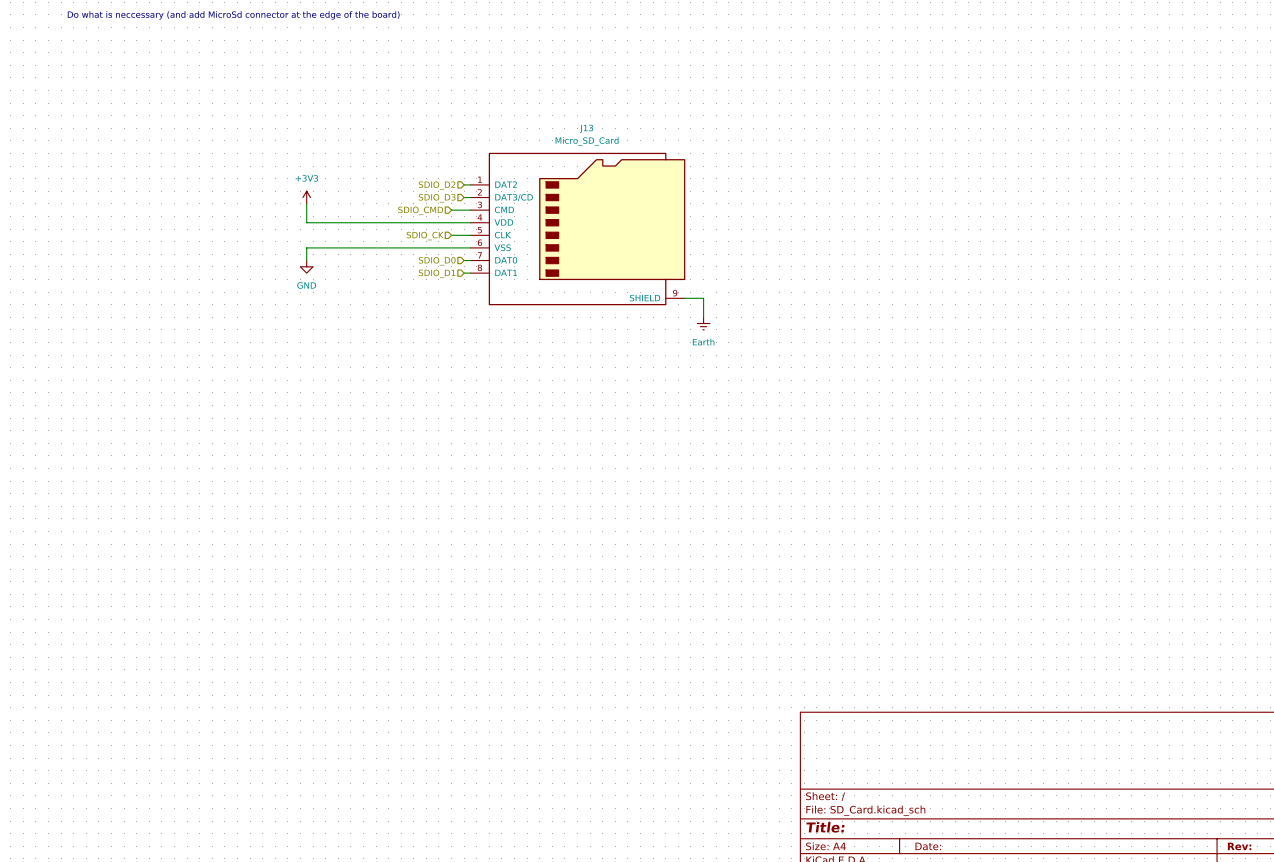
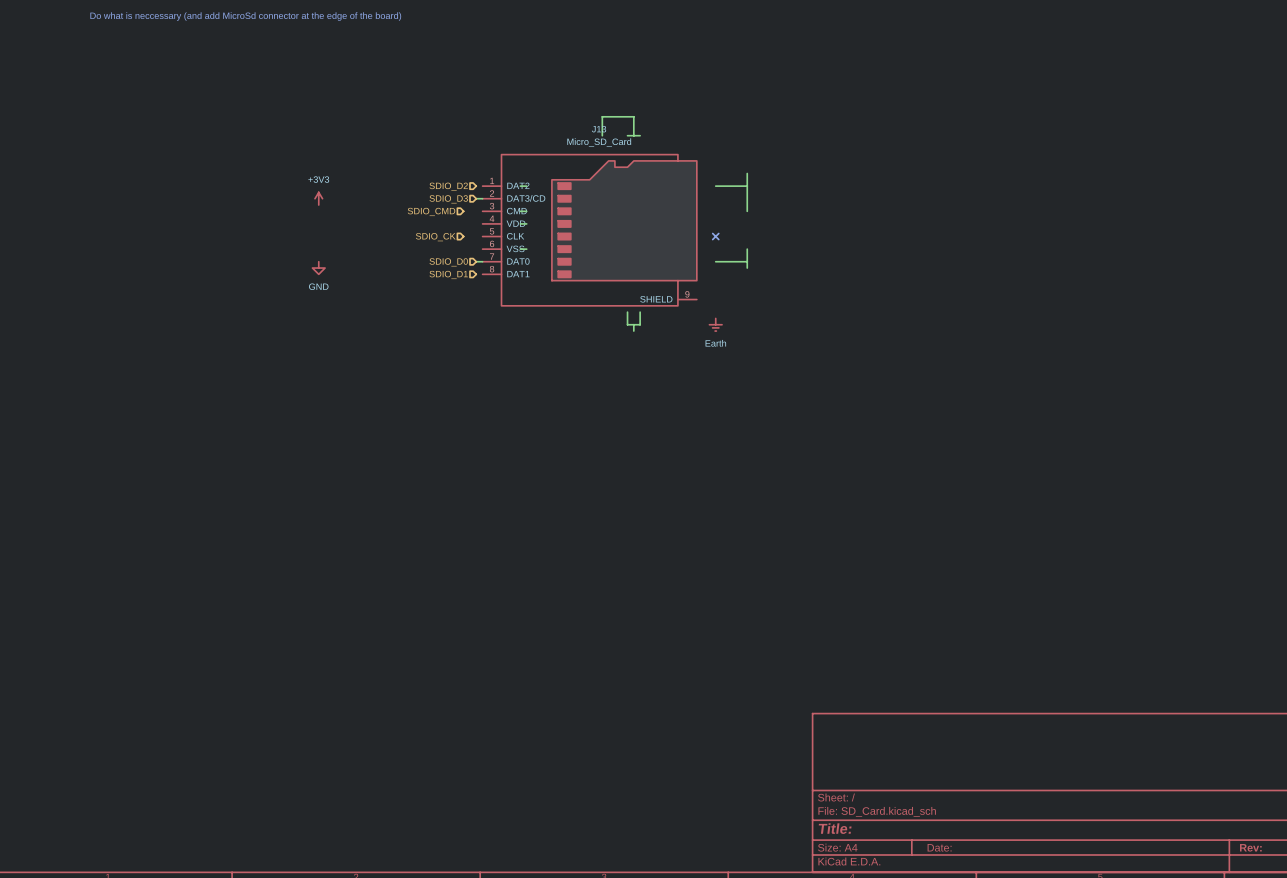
wire: none -> (602, 135) (602, 116) (633, 116) (633, 135)
wire: none -> (627, 135) (640, 135)
wire: none -> (747, 173) (747, 211)
wire: (464, 184) (470, 184) -> (520, 186) (526, 186)
wire: none -> (715, 186) (747, 186)
wire: (306, 203) (306, 222) (470, 222) -> none
wire: (451, 210) (470, 210) -> none
wire: none -> (520, 211) (526, 211)
wire: none -> (520, 223) (526, 223)
wire: (451, 235) (470, 235) -> none
no-connect mark: none -> (715, 236)
wire: (470, 247) (306, 247) (306, 260) -> none
wire: none -> (747, 249) (747, 268)
wire: none -> (715, 261) (747, 261)
wire: (464, 273) (470, 273) -> (520, 249) (526, 249)
wire: (684, 298) (703, 298) (703, 317) -> none
wire: none -> (627, 312) (627, 324) (640, 324) (640, 312)
wire: none -> (633, 324) (633, 331)

